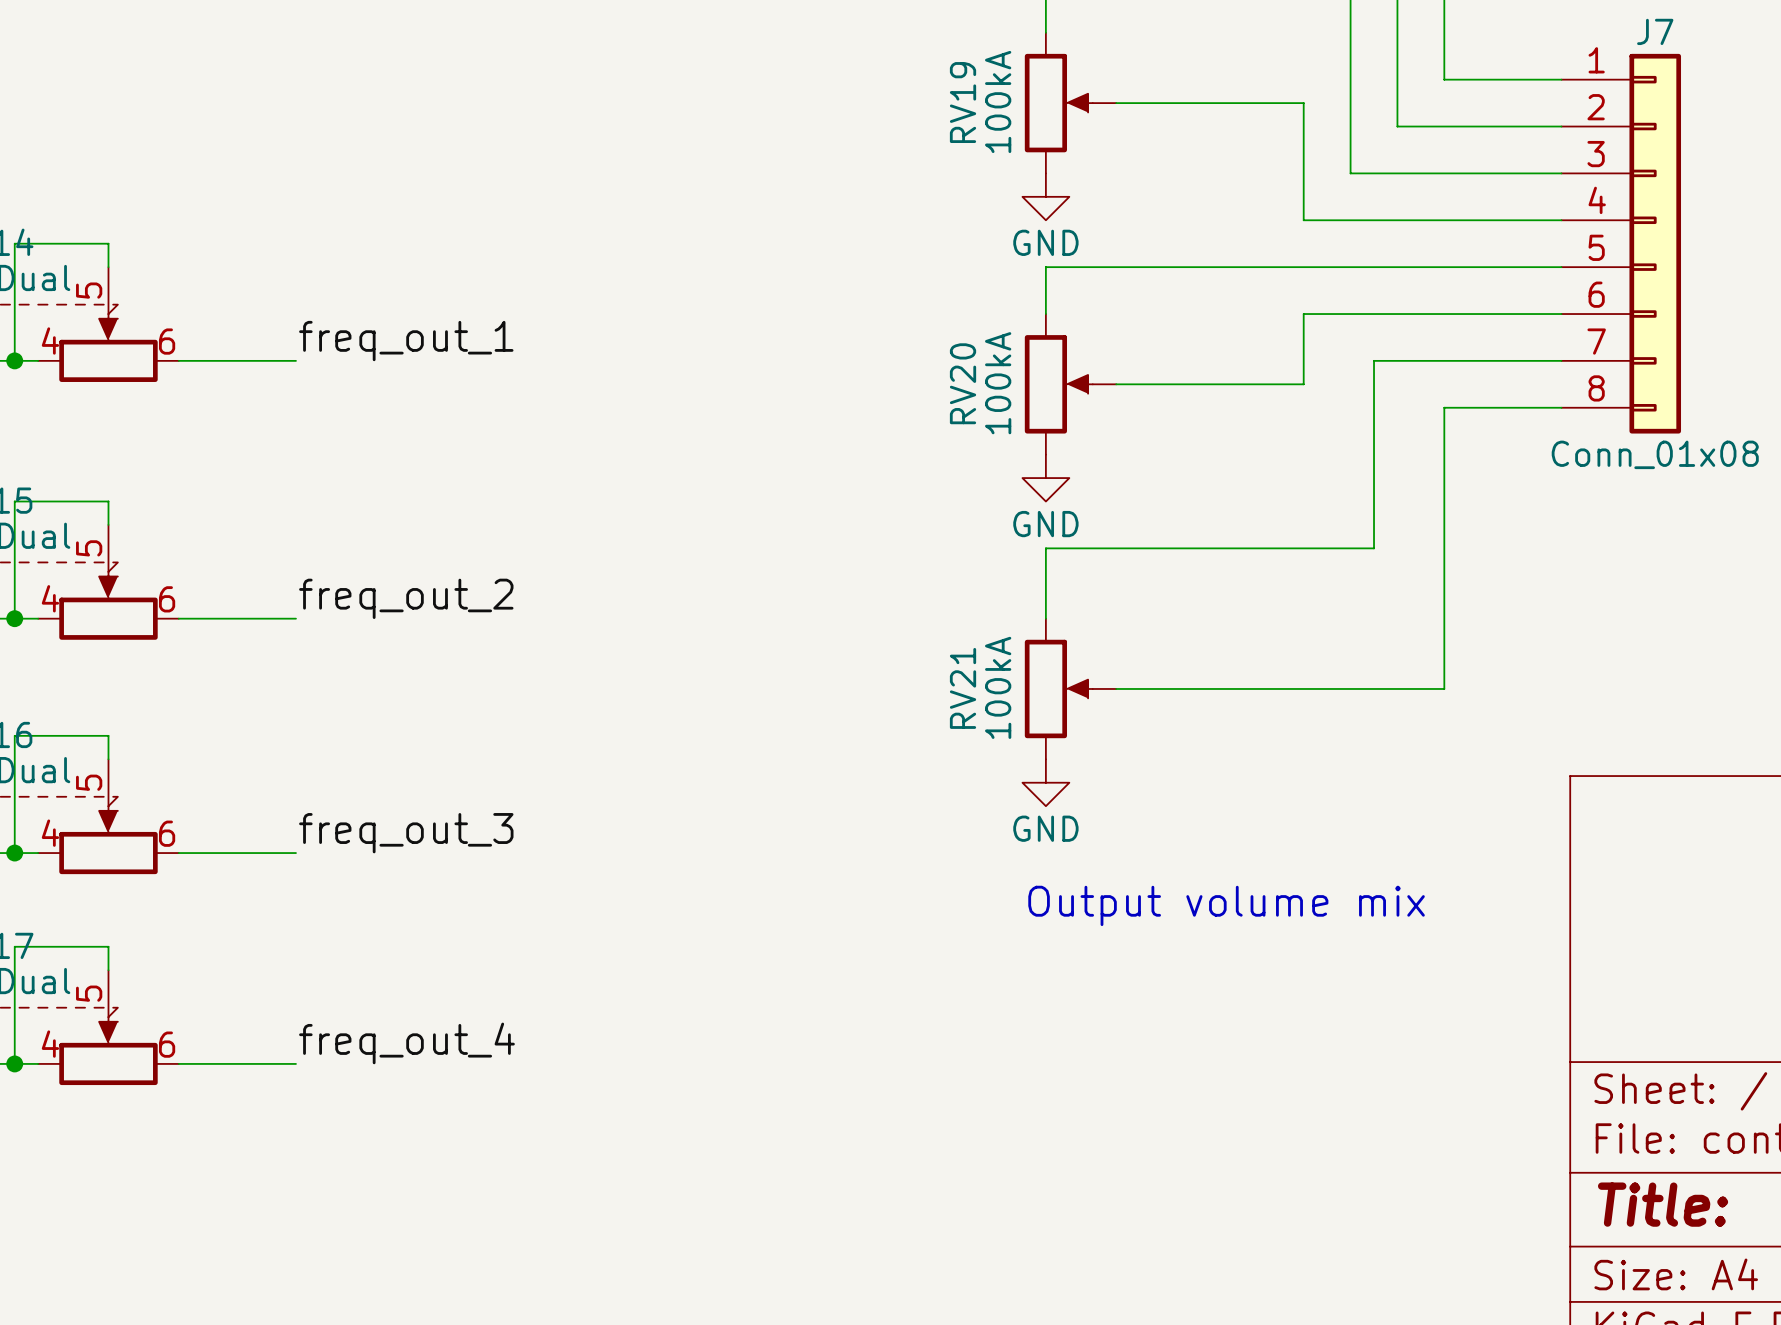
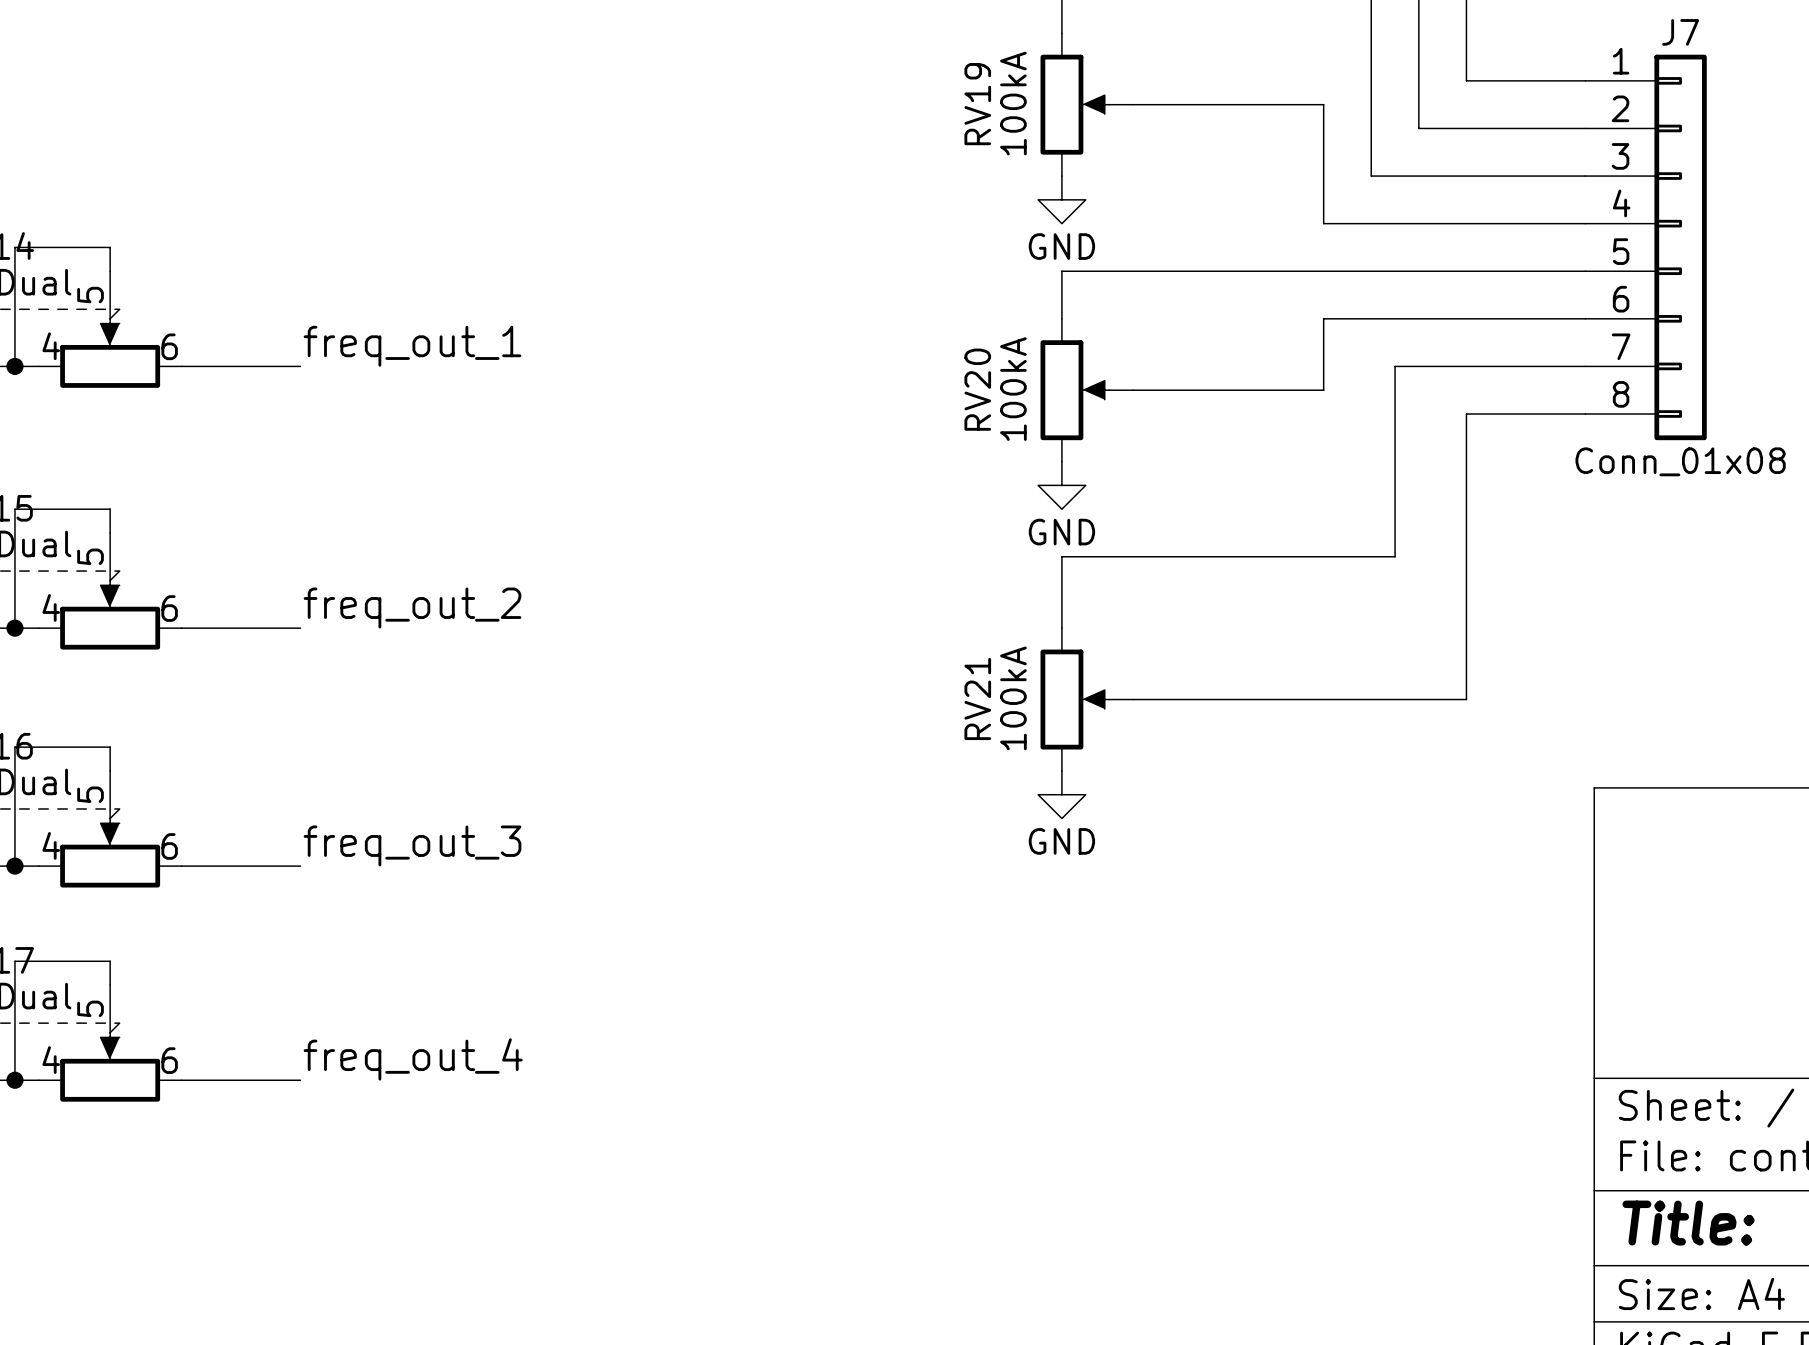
text: Output volume mix (1226, 905) -> none

